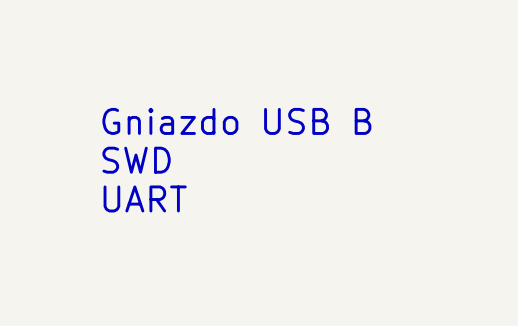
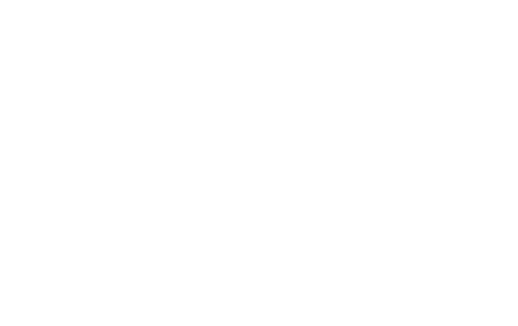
text: Gniazdo USB B (236, 121) -> none
text: SWD (136, 160) -> none
text: UART (145, 198) -> none

